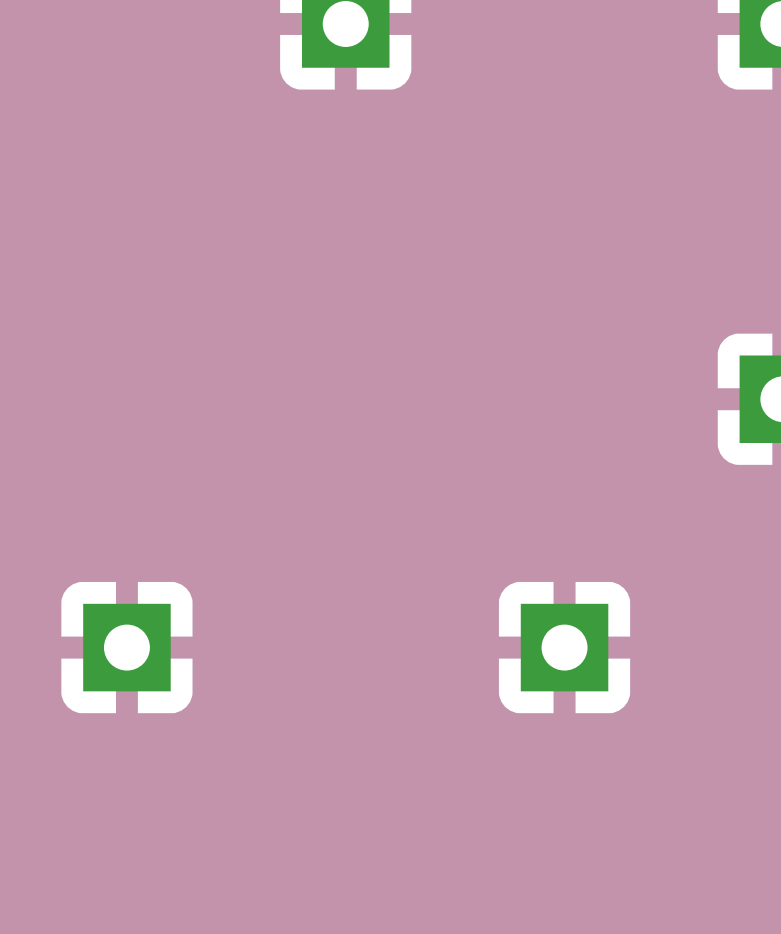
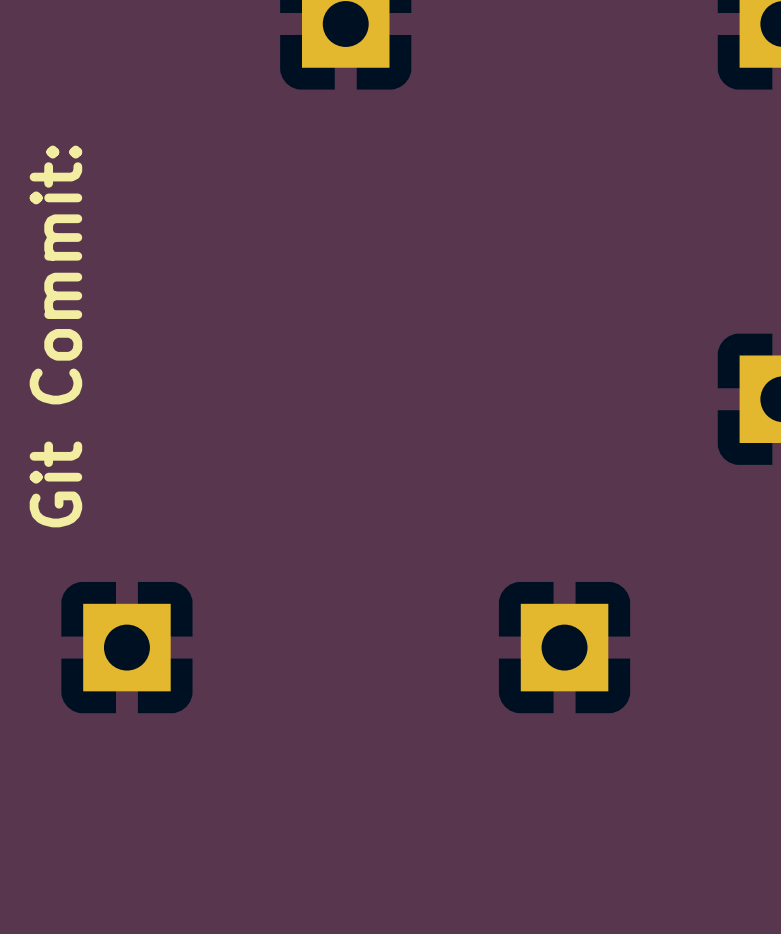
text: none -> Git Commit: (55, 336)

